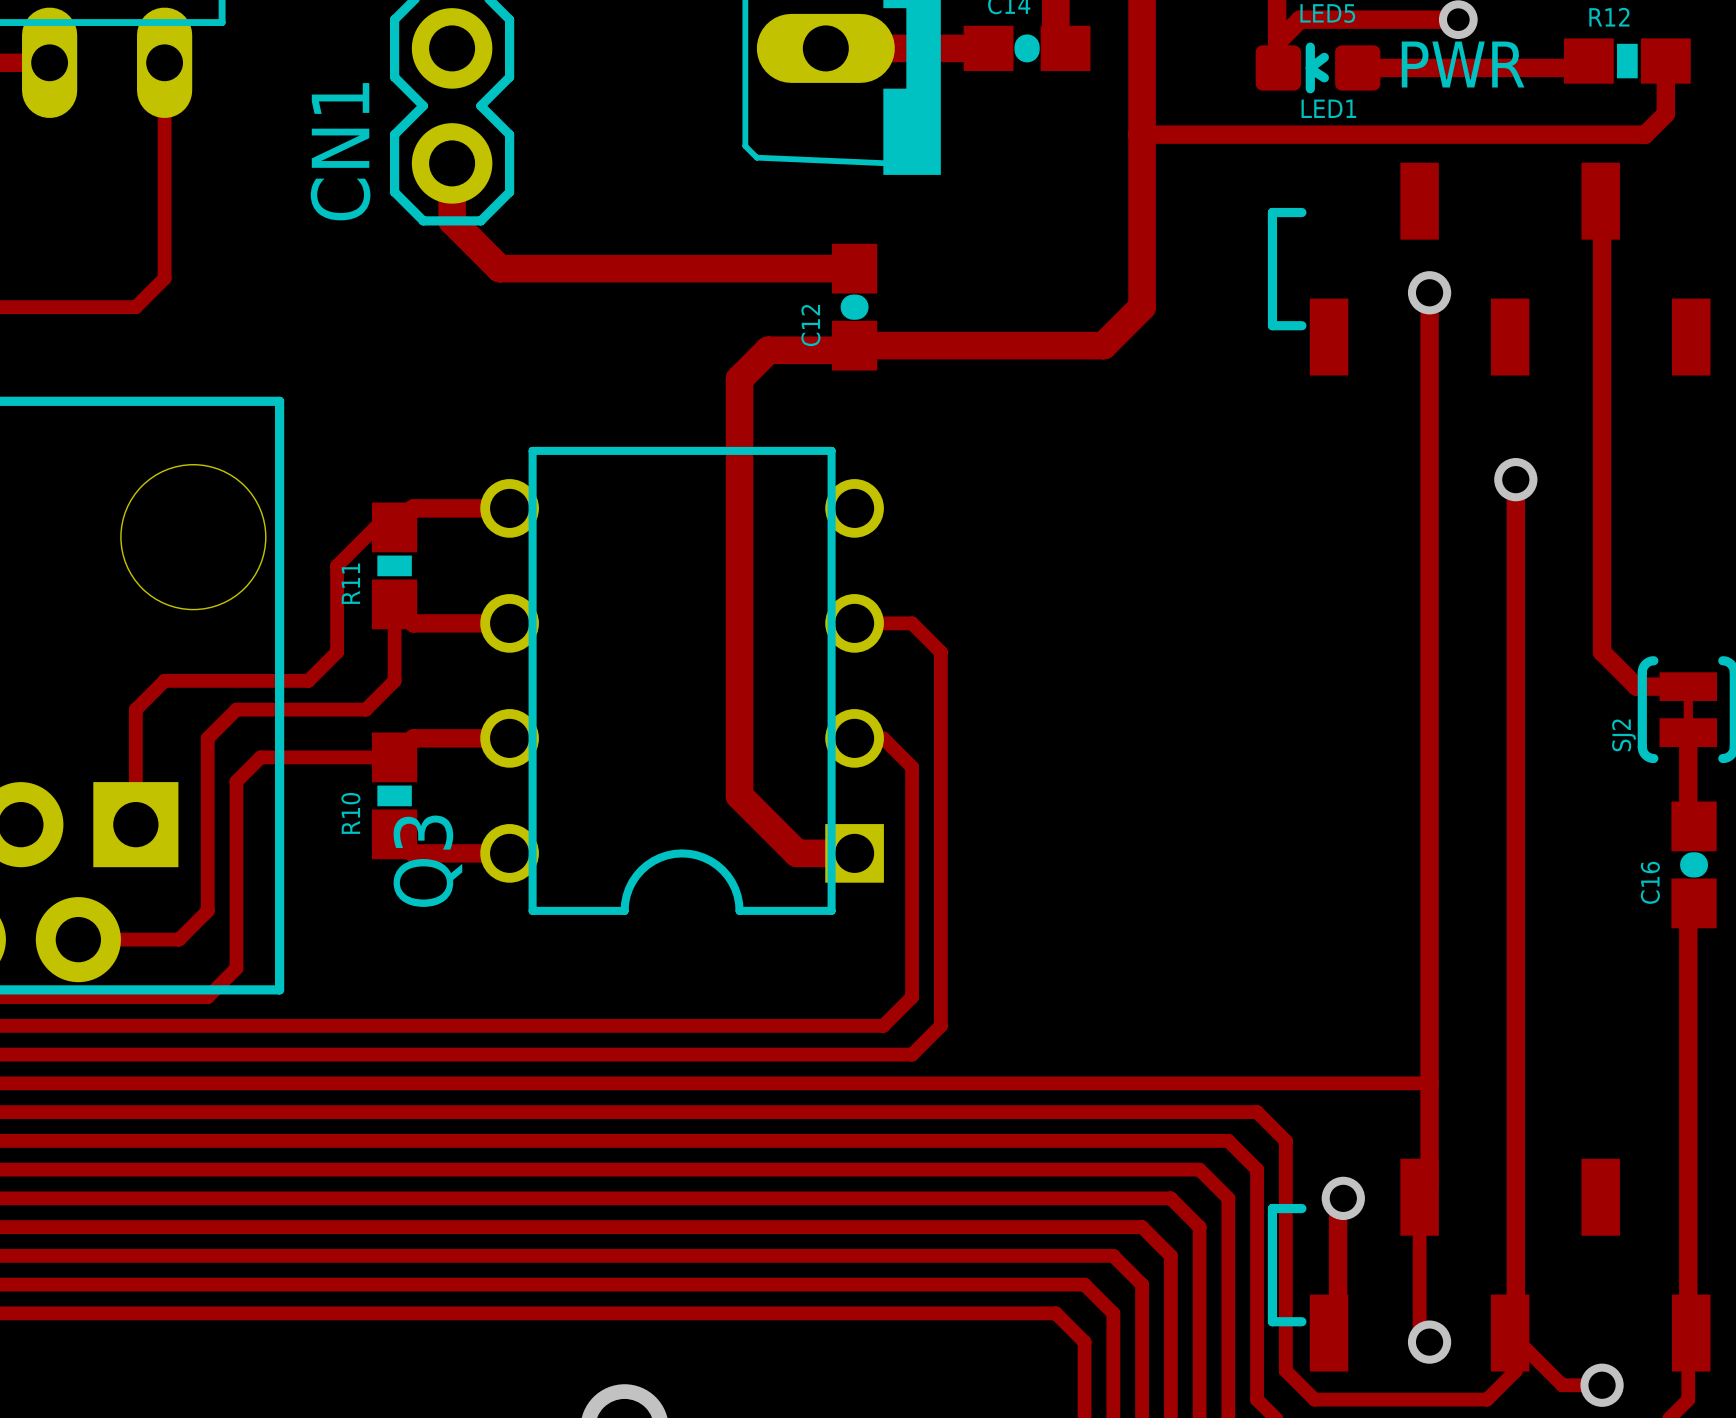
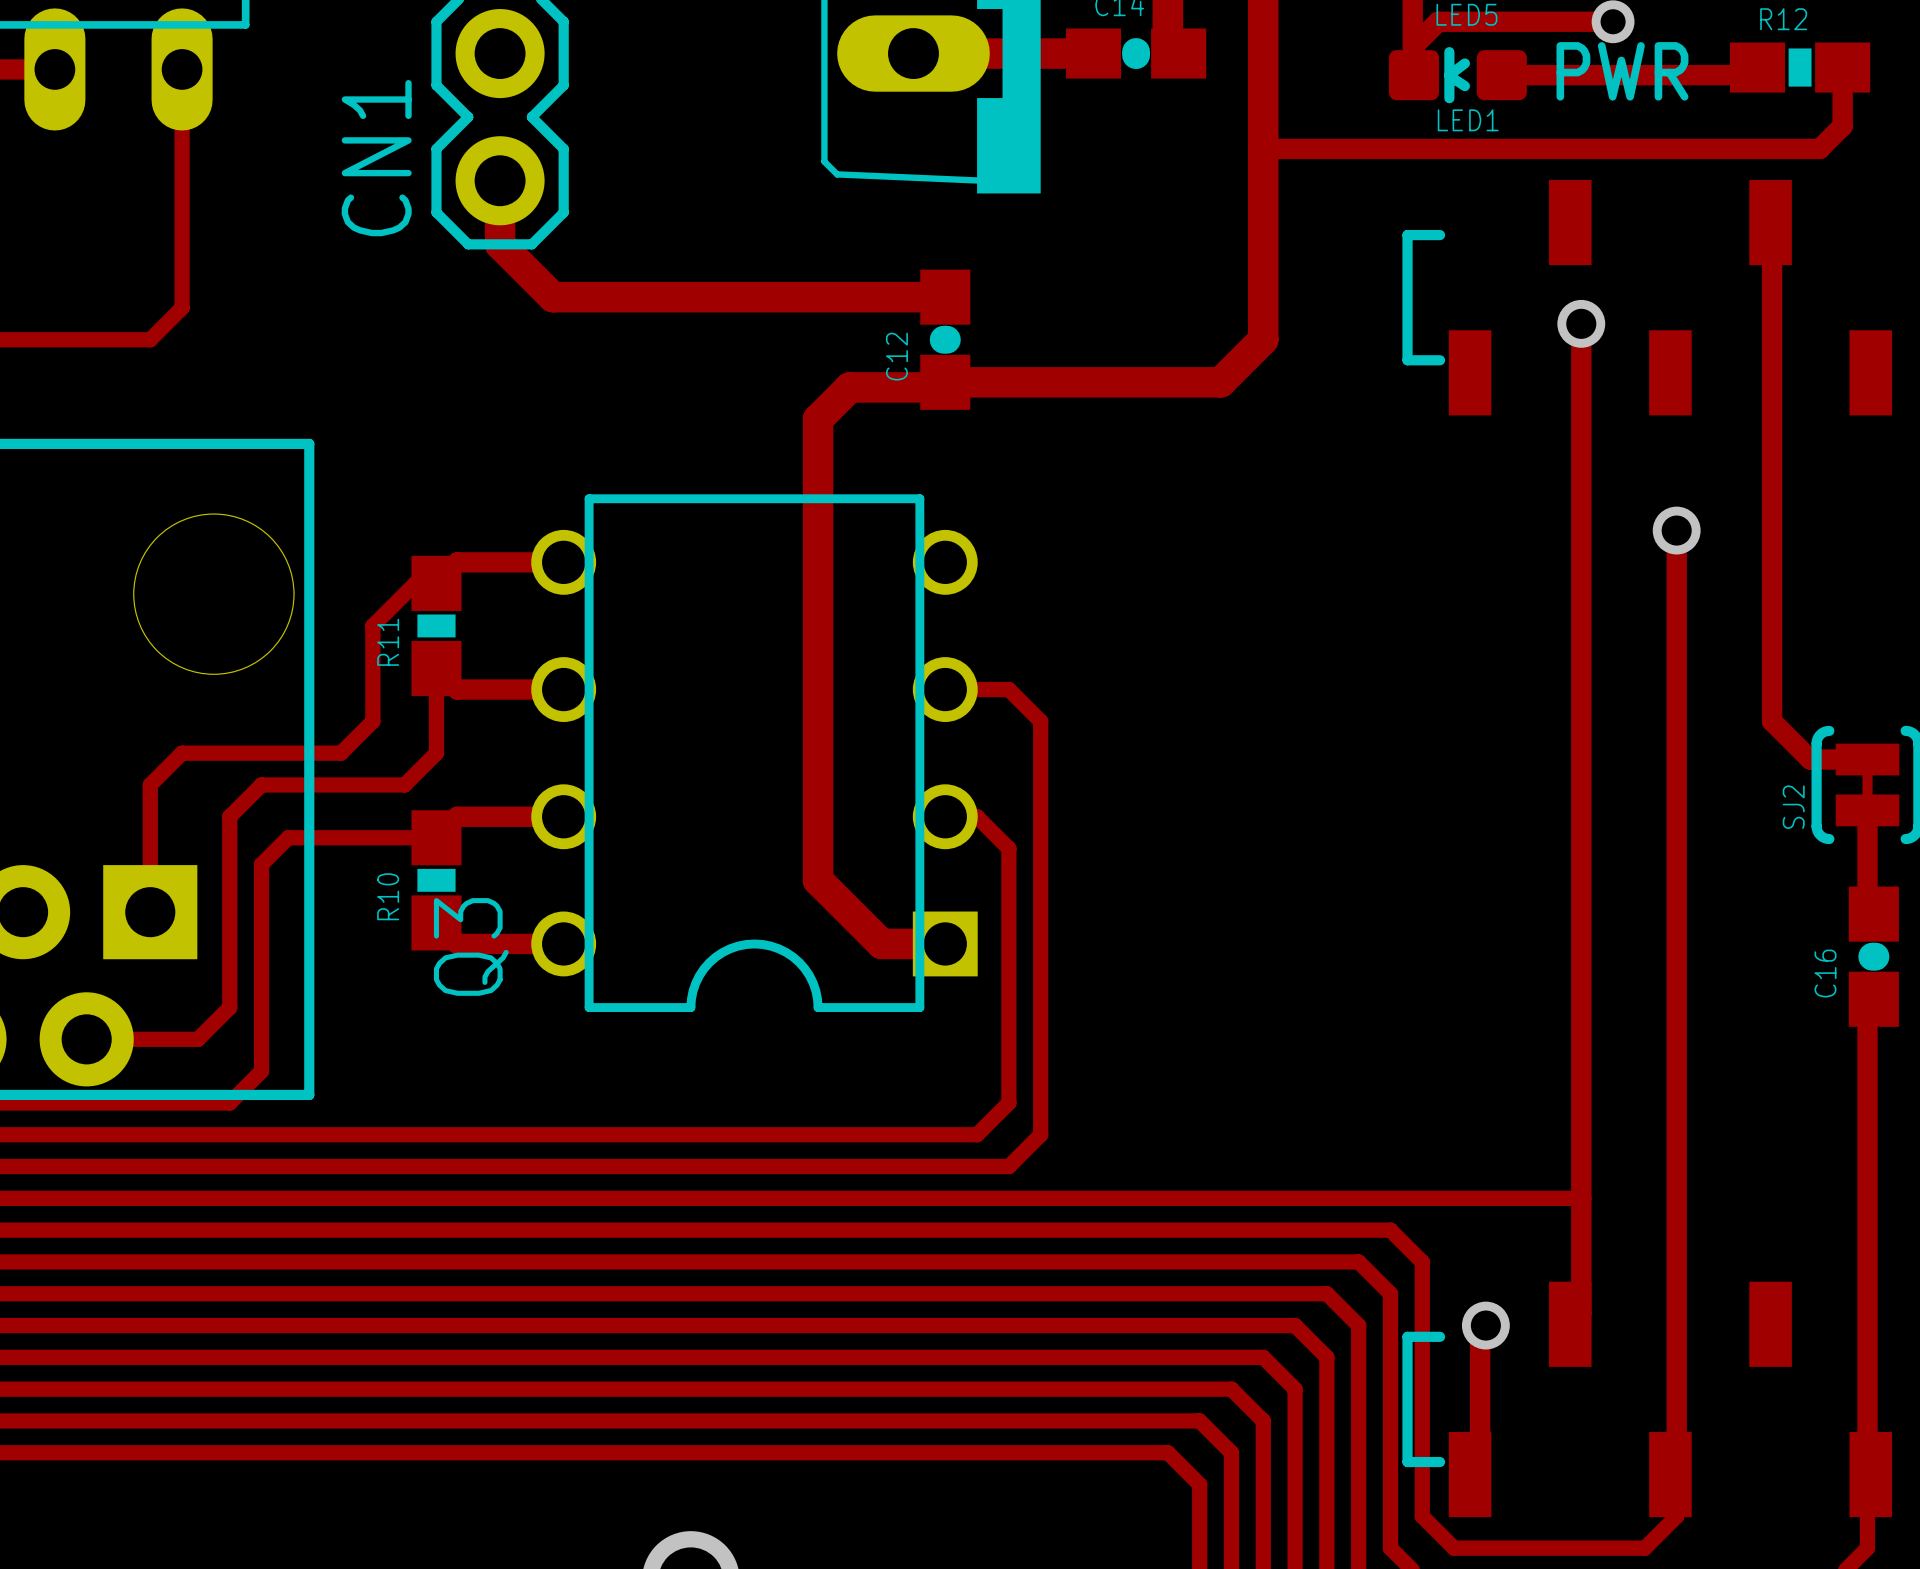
track: (1419, 1197) (1419, 1332) (1429, 1342) -> none
track: (1515, 1338) (1562, 1385) (1602, 1385) -> none
via: (1429, 1342) -> none
via: (1602, 1385) -> none

